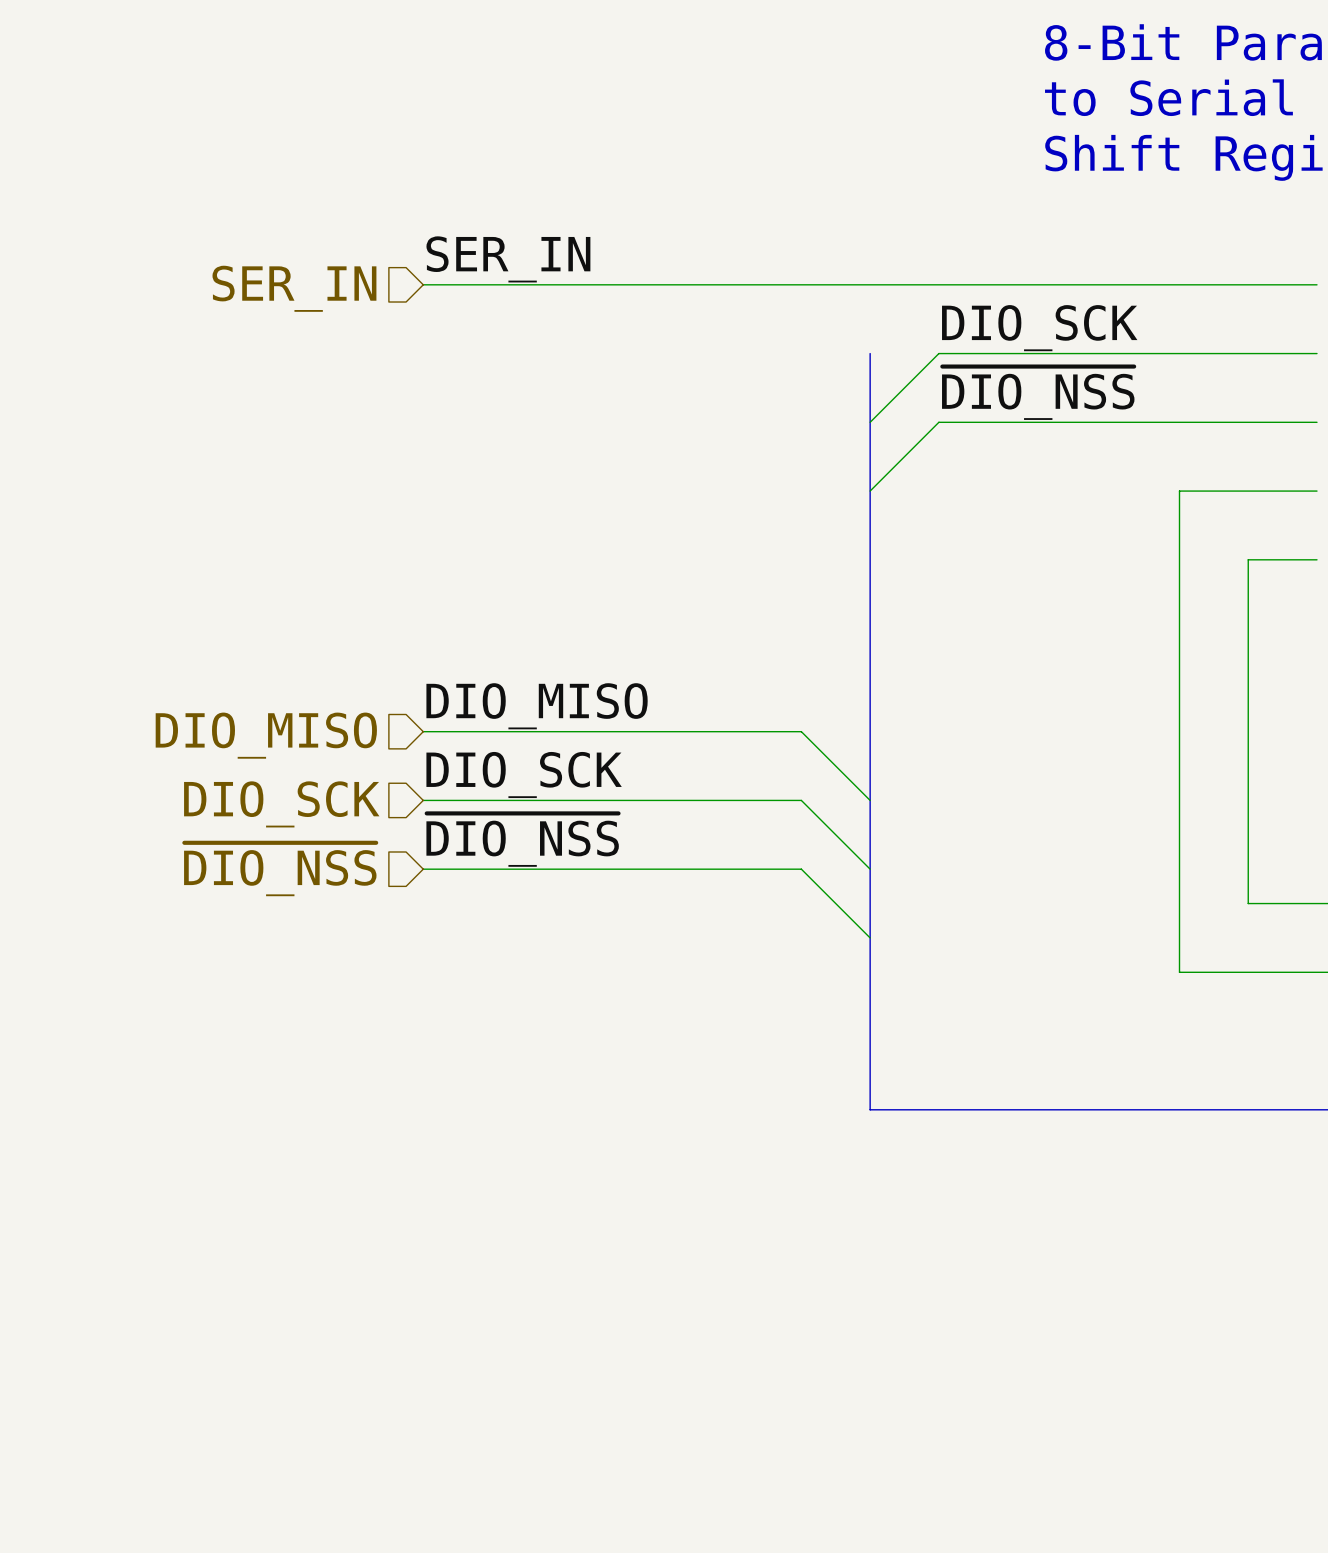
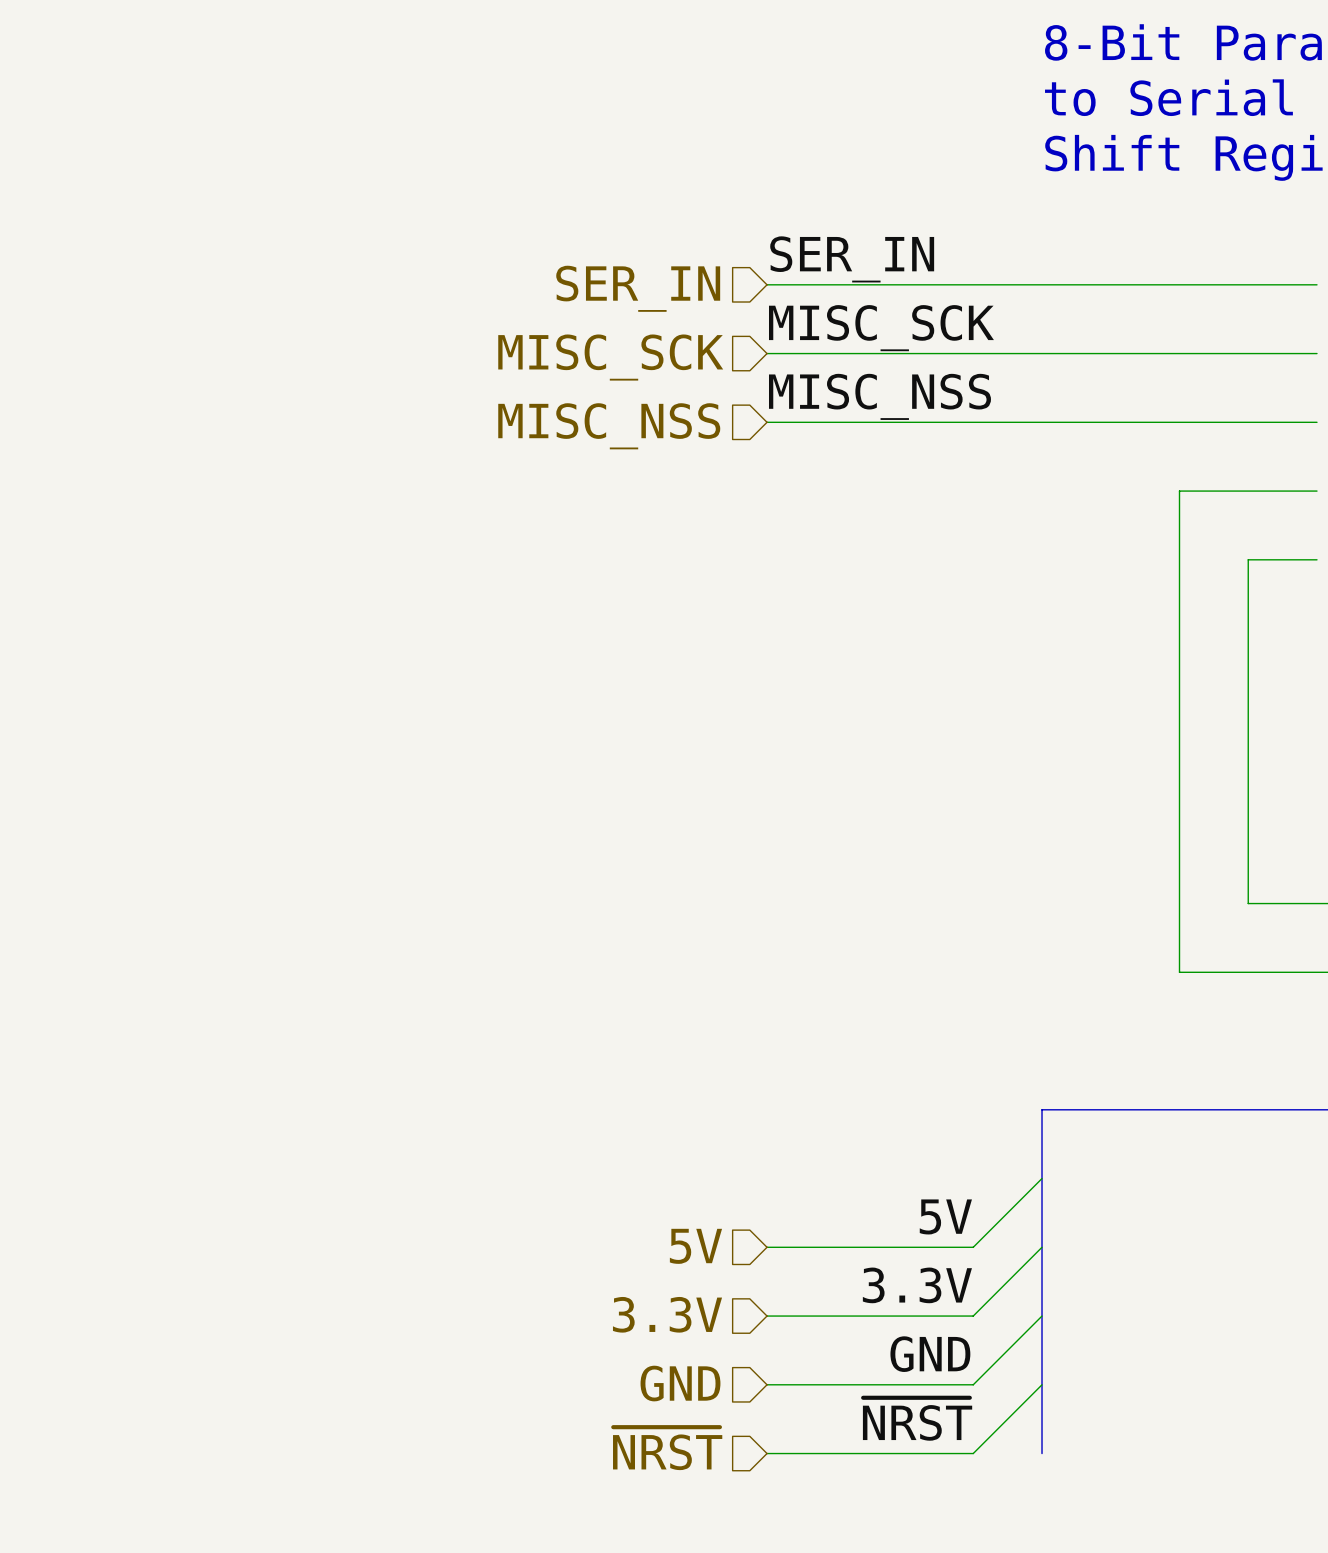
label position: SER_IN (508, 259) -> SER_IN (852, 259)
wire: (423, 284) (767, 284) -> none
hierarchical label position: SER_IN (294, 288) -> SER_IN (638, 288)
label: DIO_SCK (1039, 328) -> MISC_SCK (881, 328)
bus: (870, 353) (870, 1109) (1042, 1109) -> (1042, 1453) (1042, 1109)
wire: (938, 353) (870, 422) -> (938, 353) (767, 353)
hierarchical label: none -> MISC_SCK (610, 357)
label: ~{DIO_NSS} (1038, 393) -> none
label: none -> MISC_NSS (879, 396)
wire: (938, 422) (870, 491) -> (938, 422) (767, 422)
hierarchical label: none -> MISC_NSS (609, 426)
label: DIO_MISO (537, 706) -> none
wire: (423, 731) (801, 731) (870, 800) -> none
hierarchical label: DIO_MISO (266, 735) -> none
label: DIO_SCK (524, 775) -> none
wire: (423, 800) (801, 800) (870, 869) -> none
hierarchical label: DIO_SCK (281, 804) -> none
label: ~{DIO_NSS} (522, 840) -> none
hierarchical label: ~{DIO_NSS} (280, 869) -> none
wire: (423, 869) (801, 869) (870, 937) -> none
wire: none -> (1042, 1178) (973, 1247) (767, 1247)
label: none -> 5V (945, 1216)
hierarchical label: none -> 5V (695, 1246)
wire: none -> (1042, 1247) (973, 1316) (767, 1316)
label: none -> 3.3V (917, 1285)
hierarchical label: none -> 3.3V (667, 1314)
wire: none -> (1042, 1316) (973, 1384) (767, 1384)
label: none -> GND (930, 1354)
hierarchical label: none -> GND (680, 1383)
wire: none -> (1042, 1384) (973, 1453) (767, 1453)
label: none -> ~{NRST} (917, 1419)
hierarchical label: none -> ~{NRST} (667, 1448)

